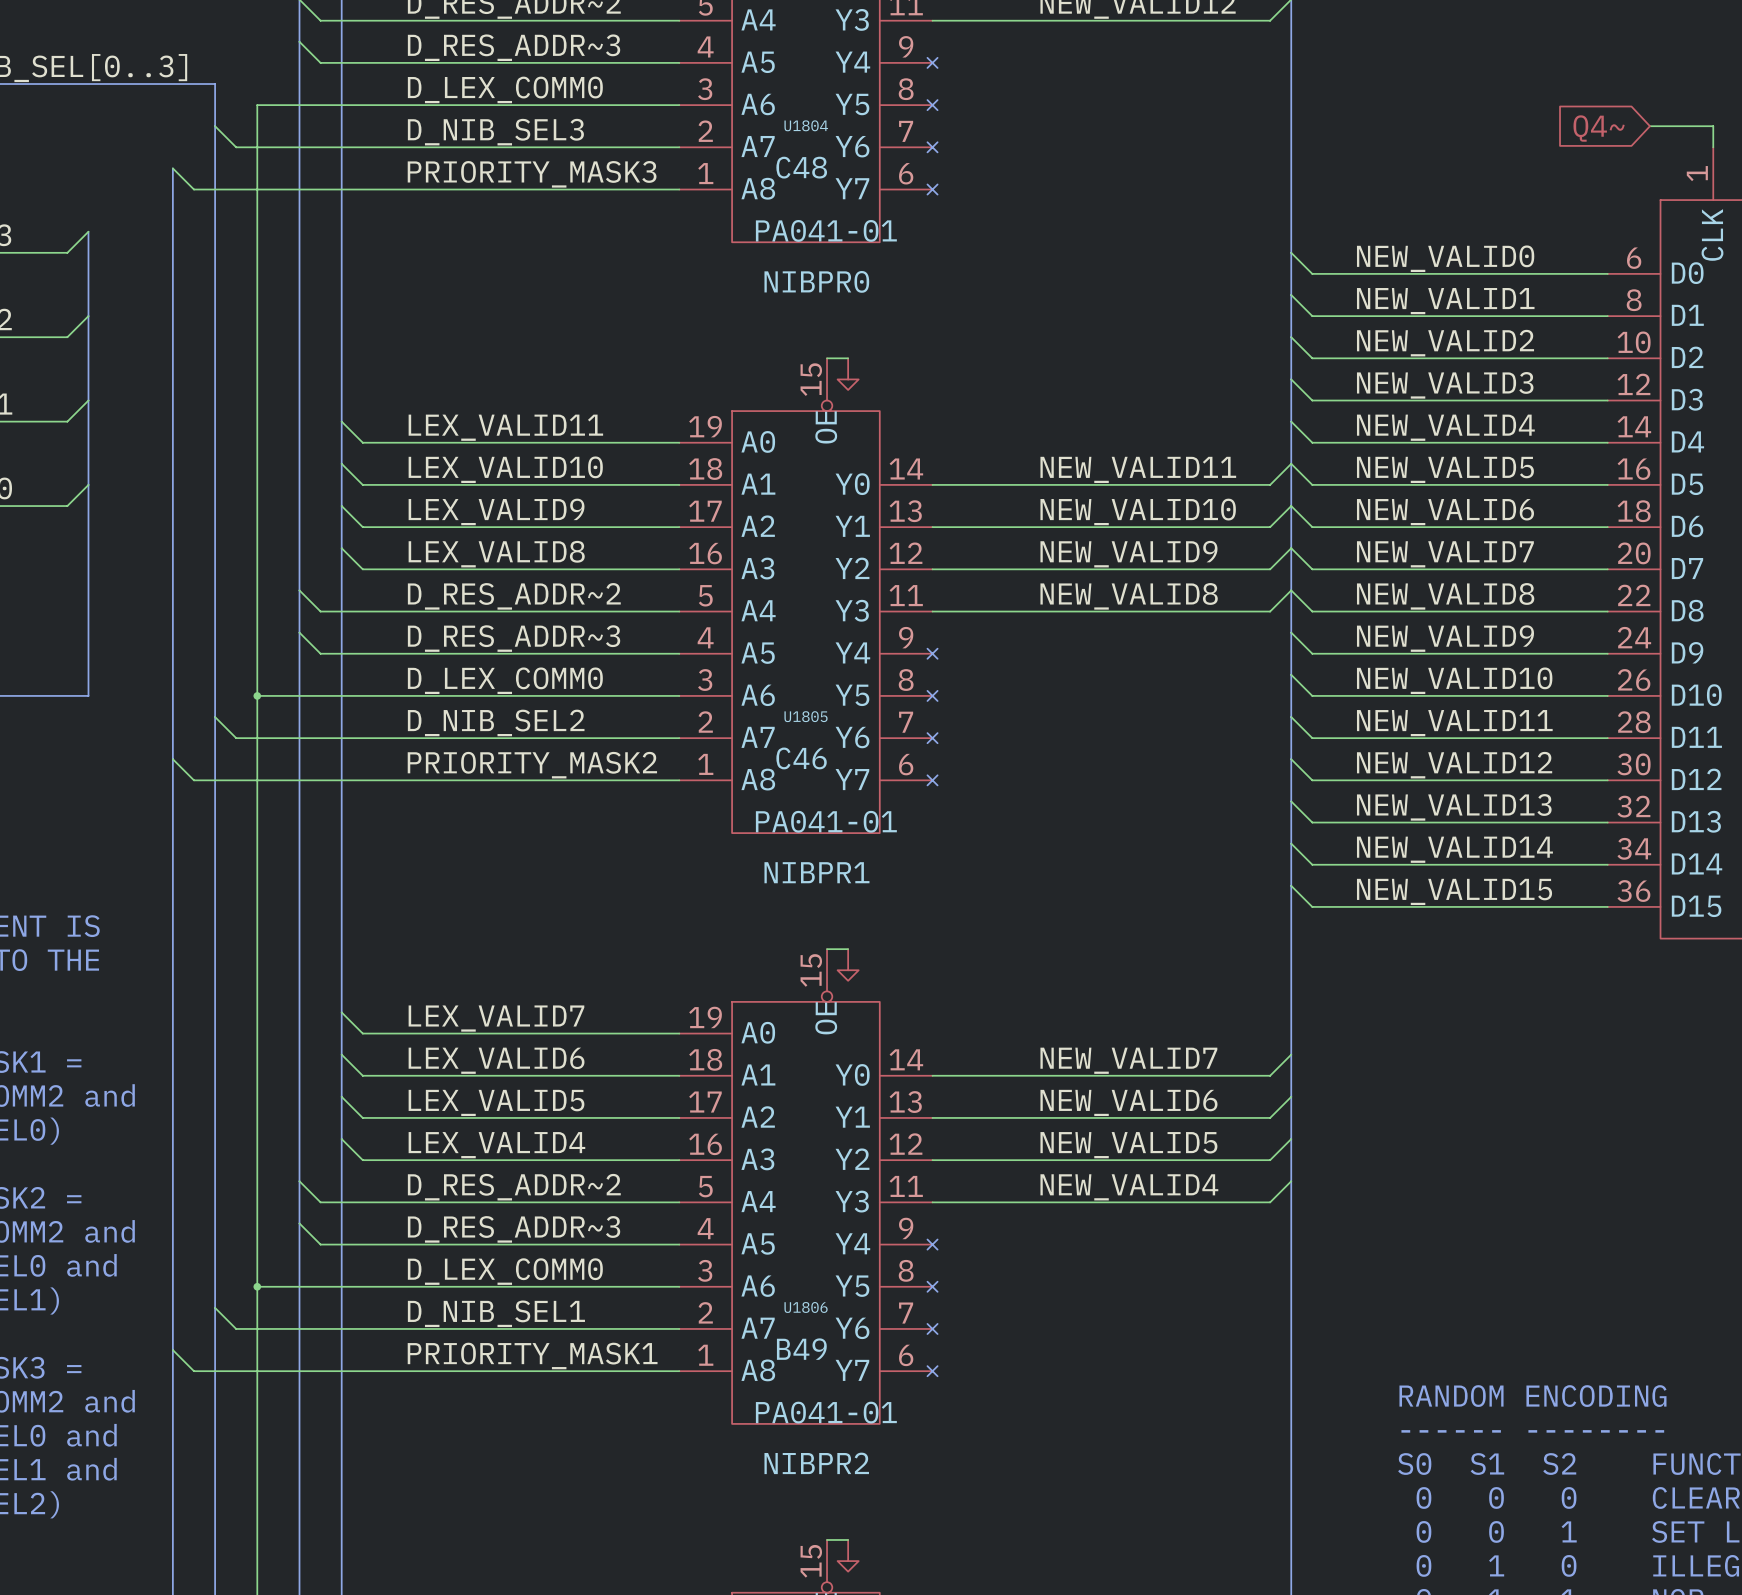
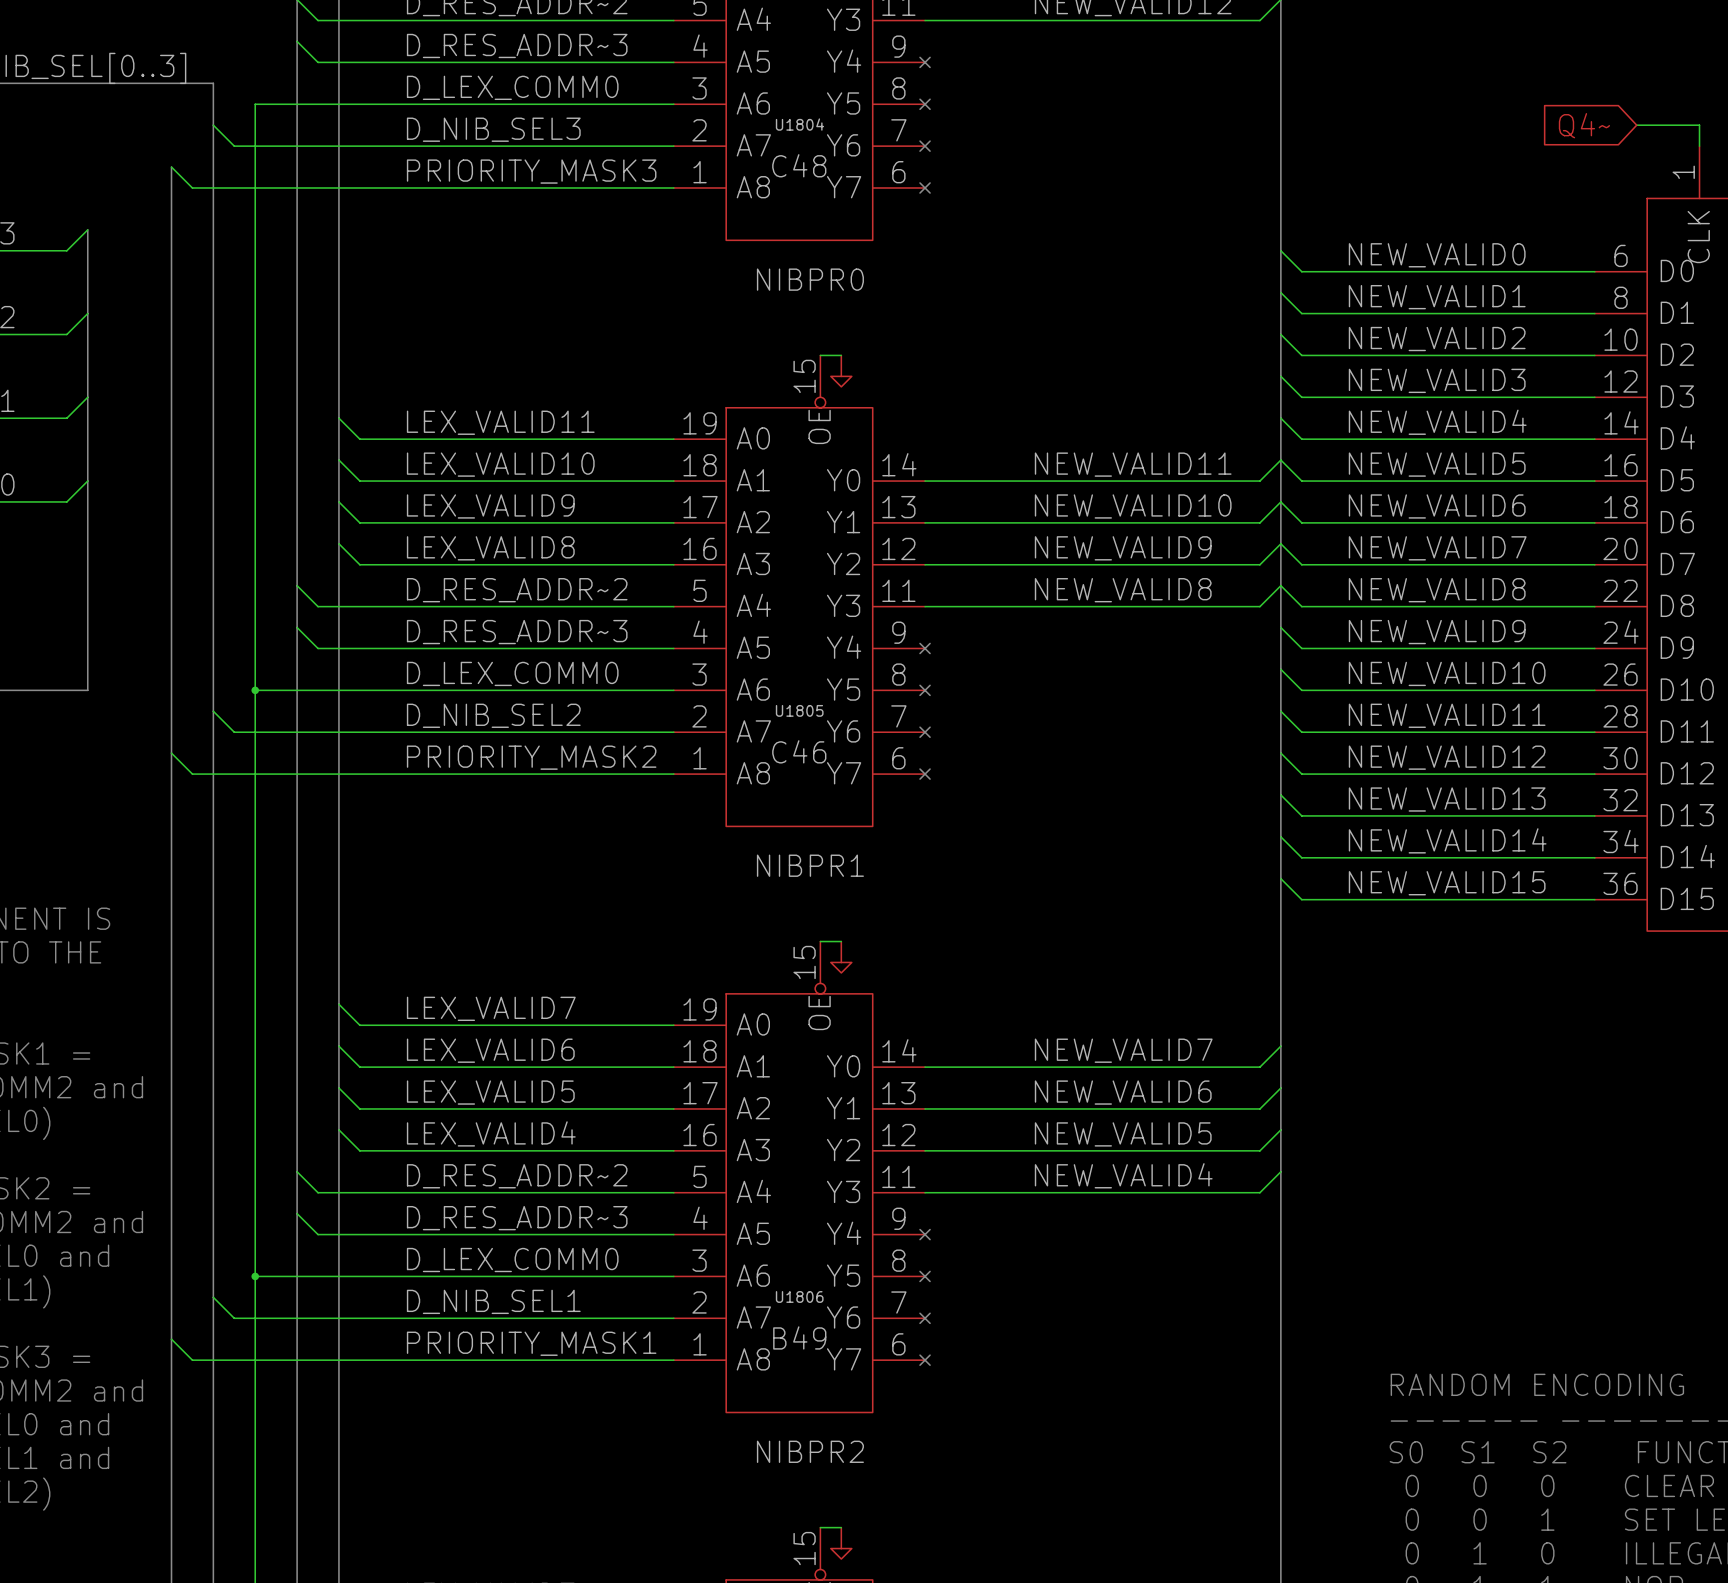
U1804 value: PA041-01 (826, 230) -> none
U1805 value: PA041-01 (826, 821) -> none
U1806 value: PA041-01 (826, 1412) -> none

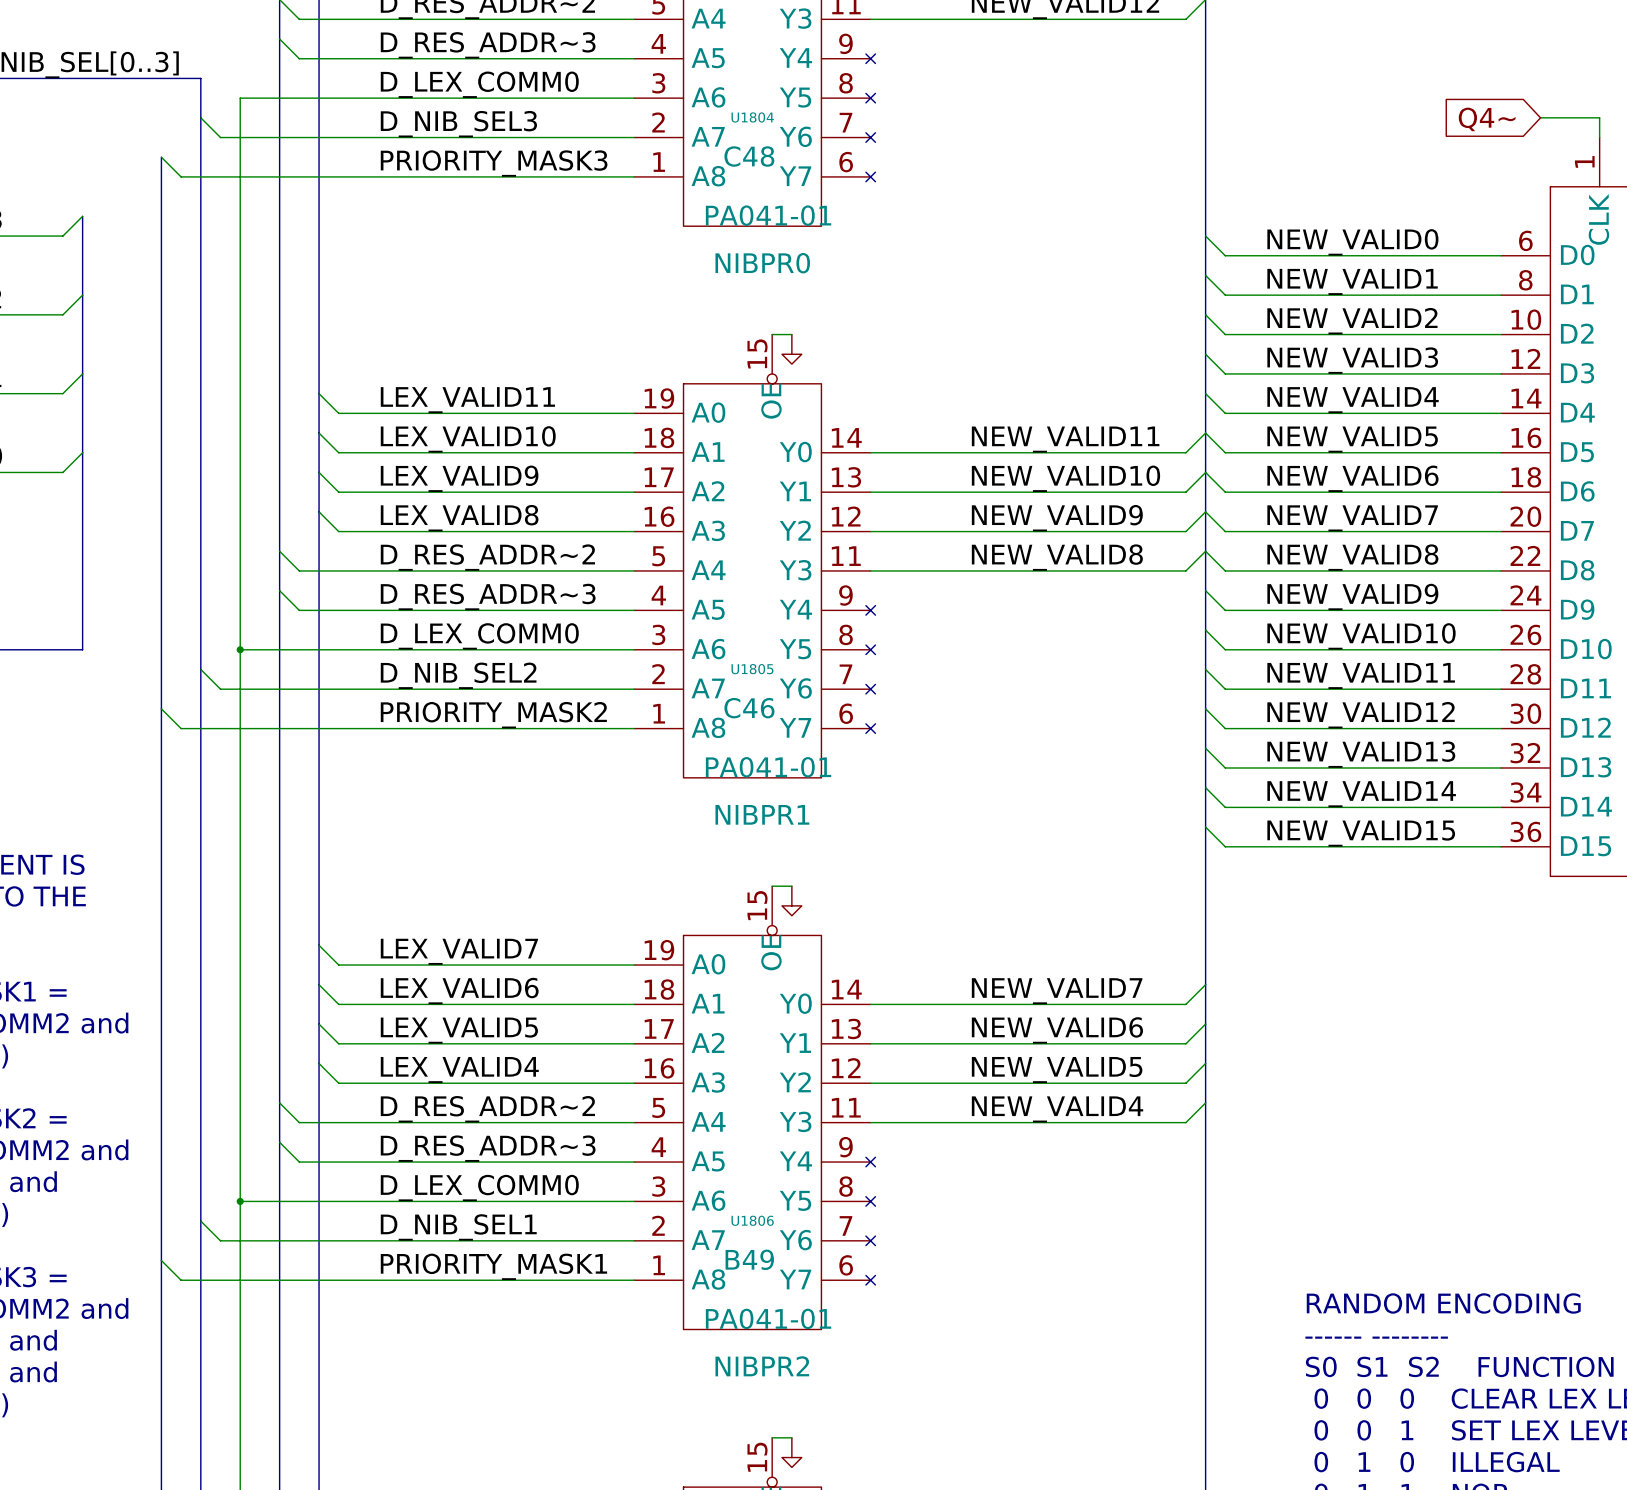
U1804 value: none -> PA041-01 (768, 215)
U1805 value: none -> PA041-01 (768, 767)
U1806 value: none -> PA041-01 (768, 1318)

